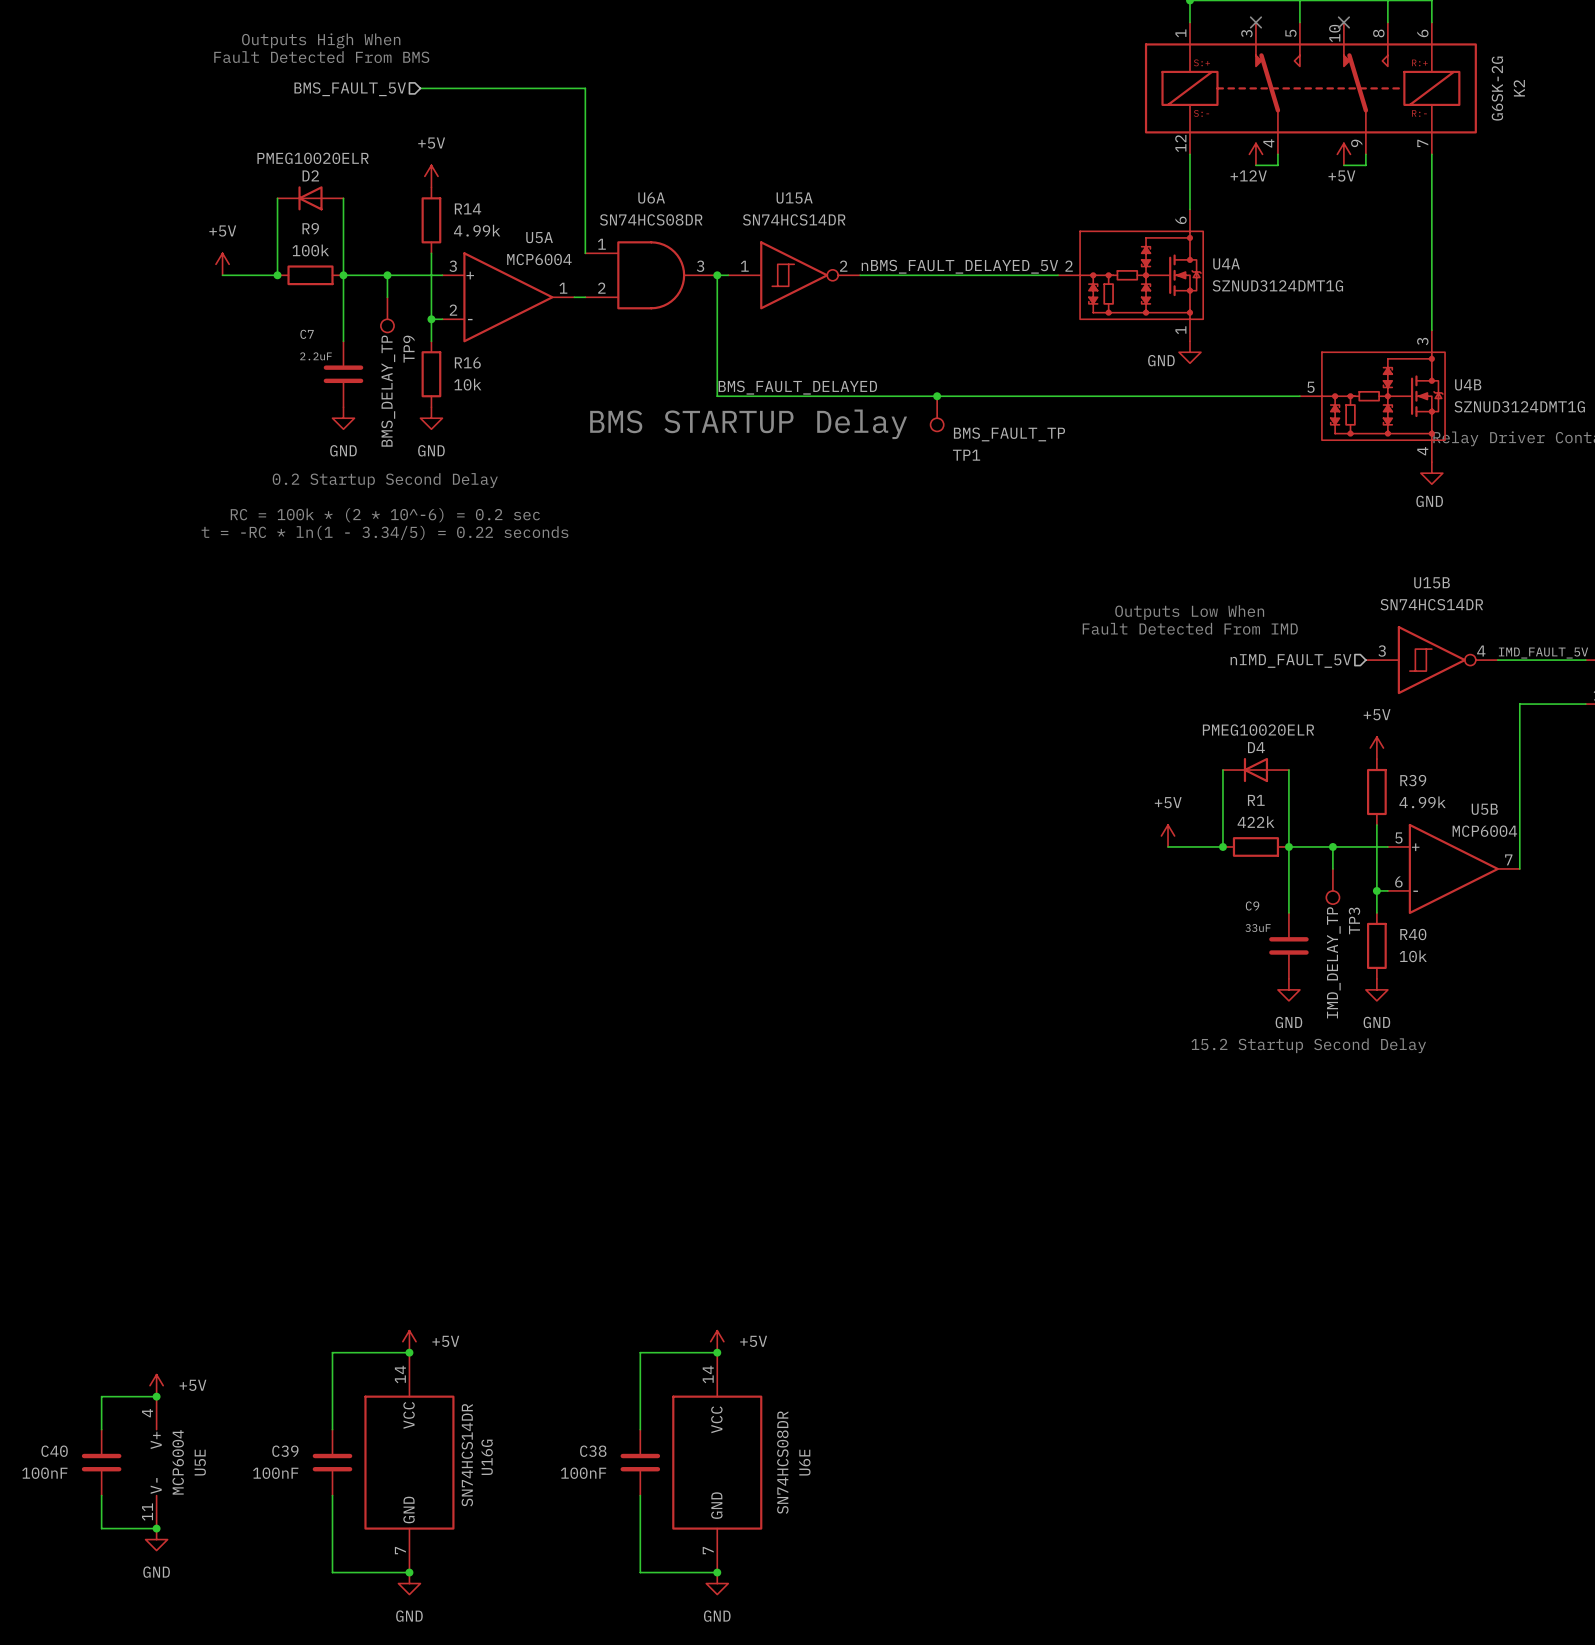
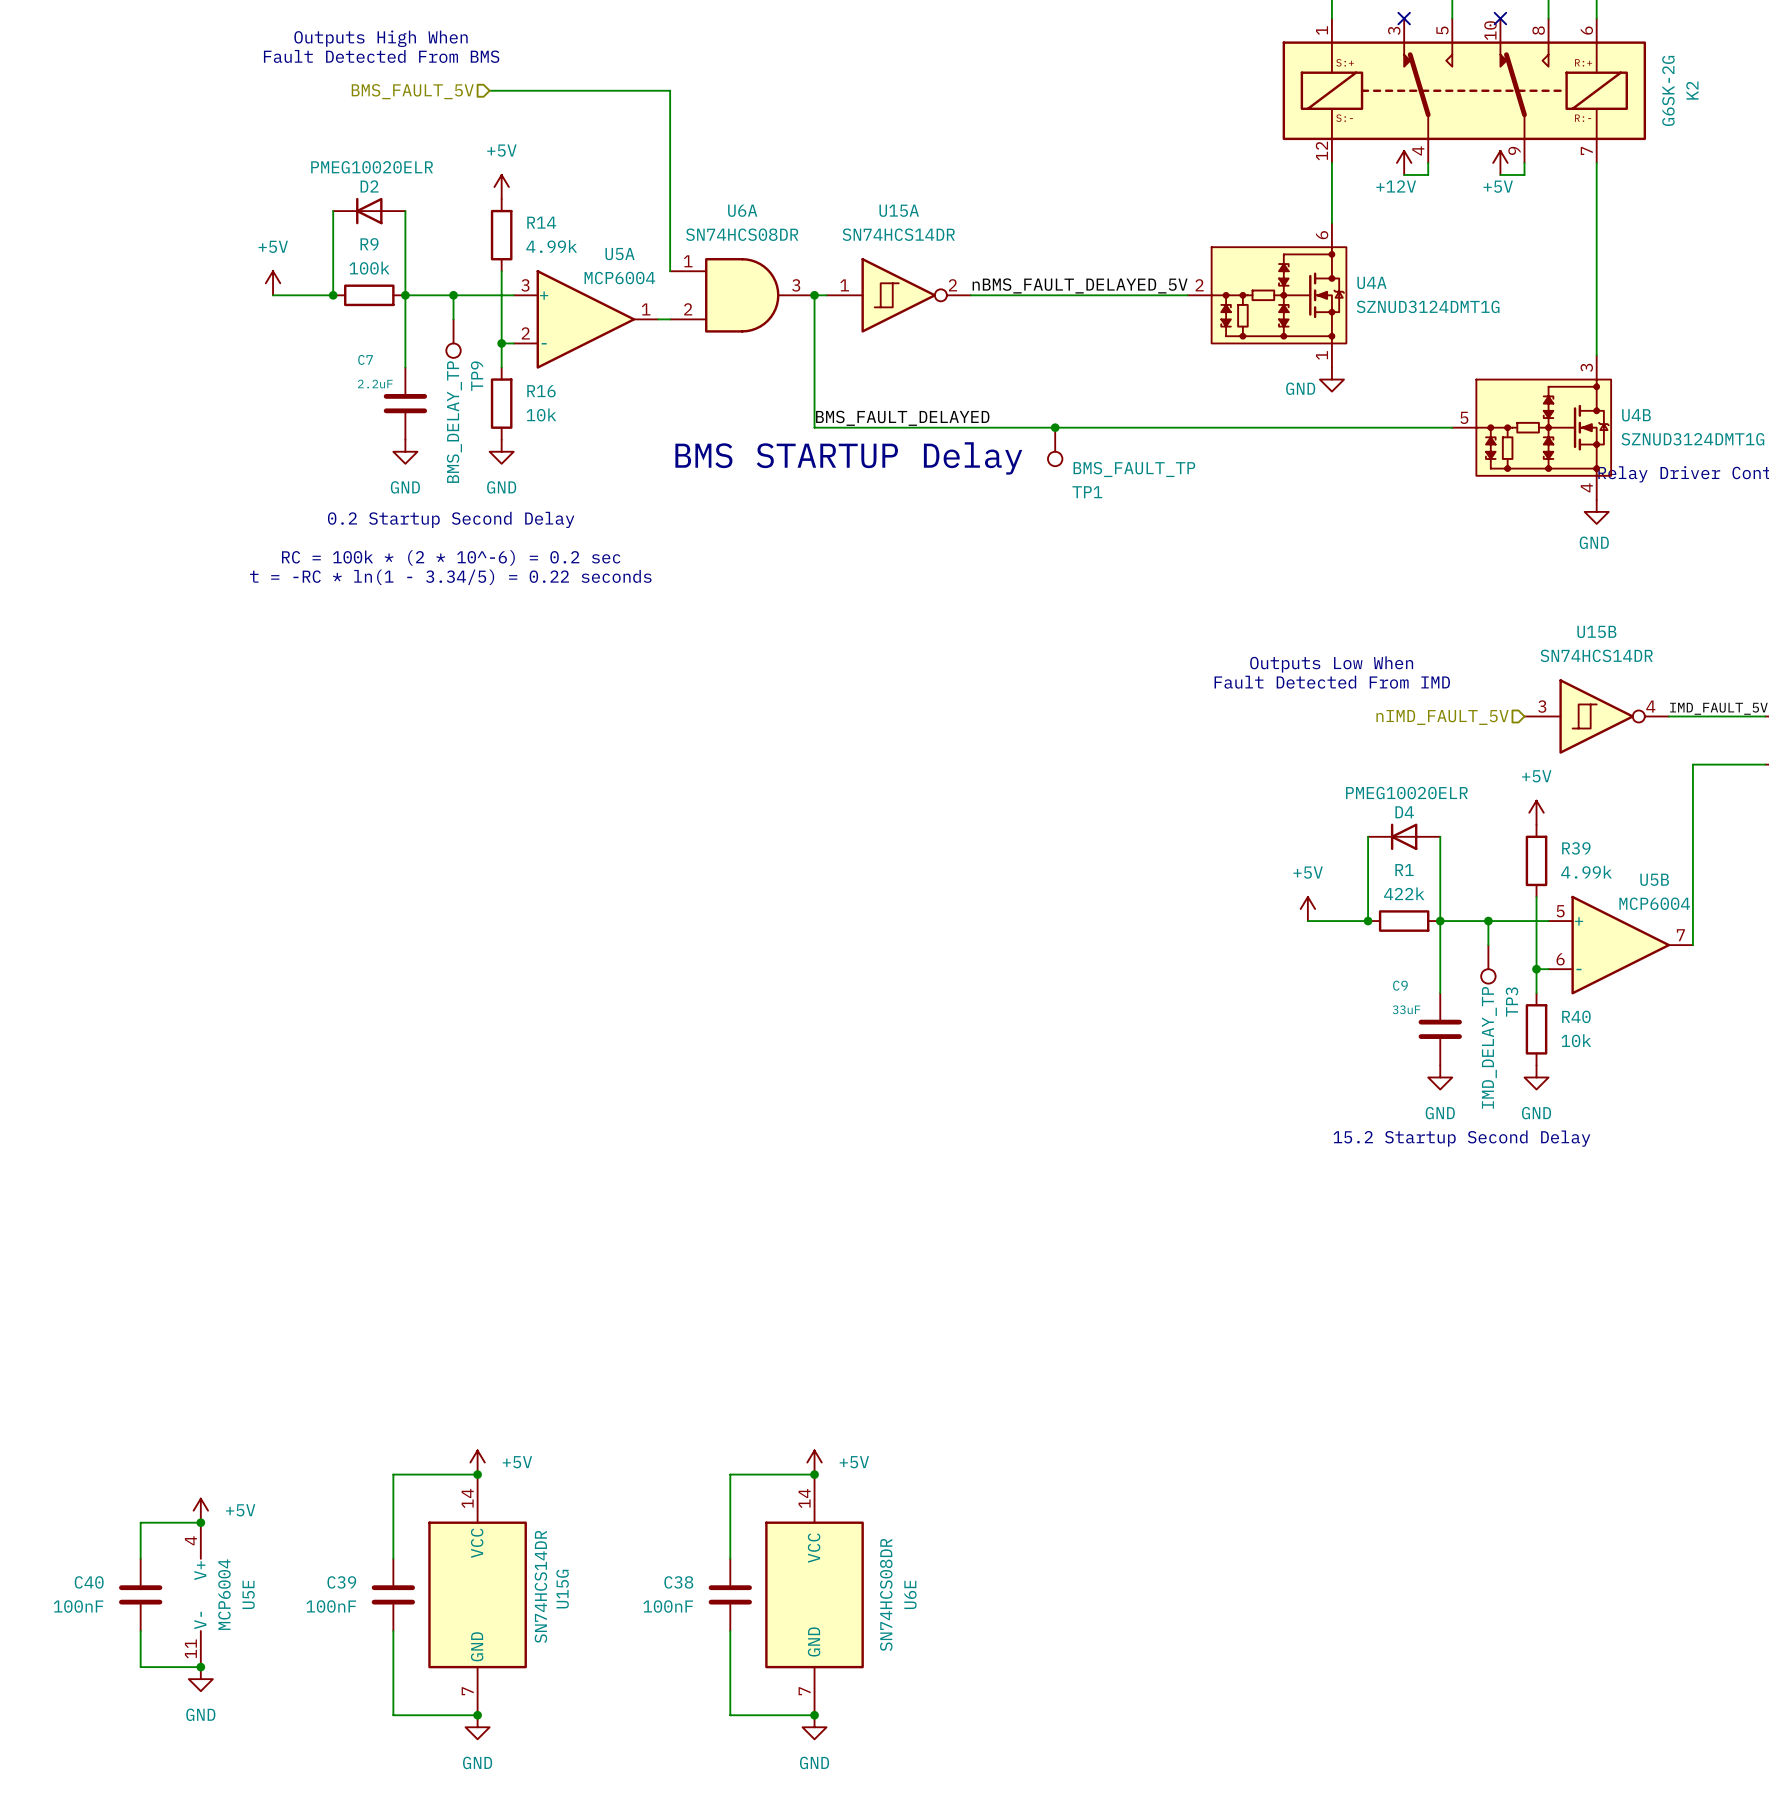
U16G name: U16G (487, 1457) -> U15G (562, 1589)

